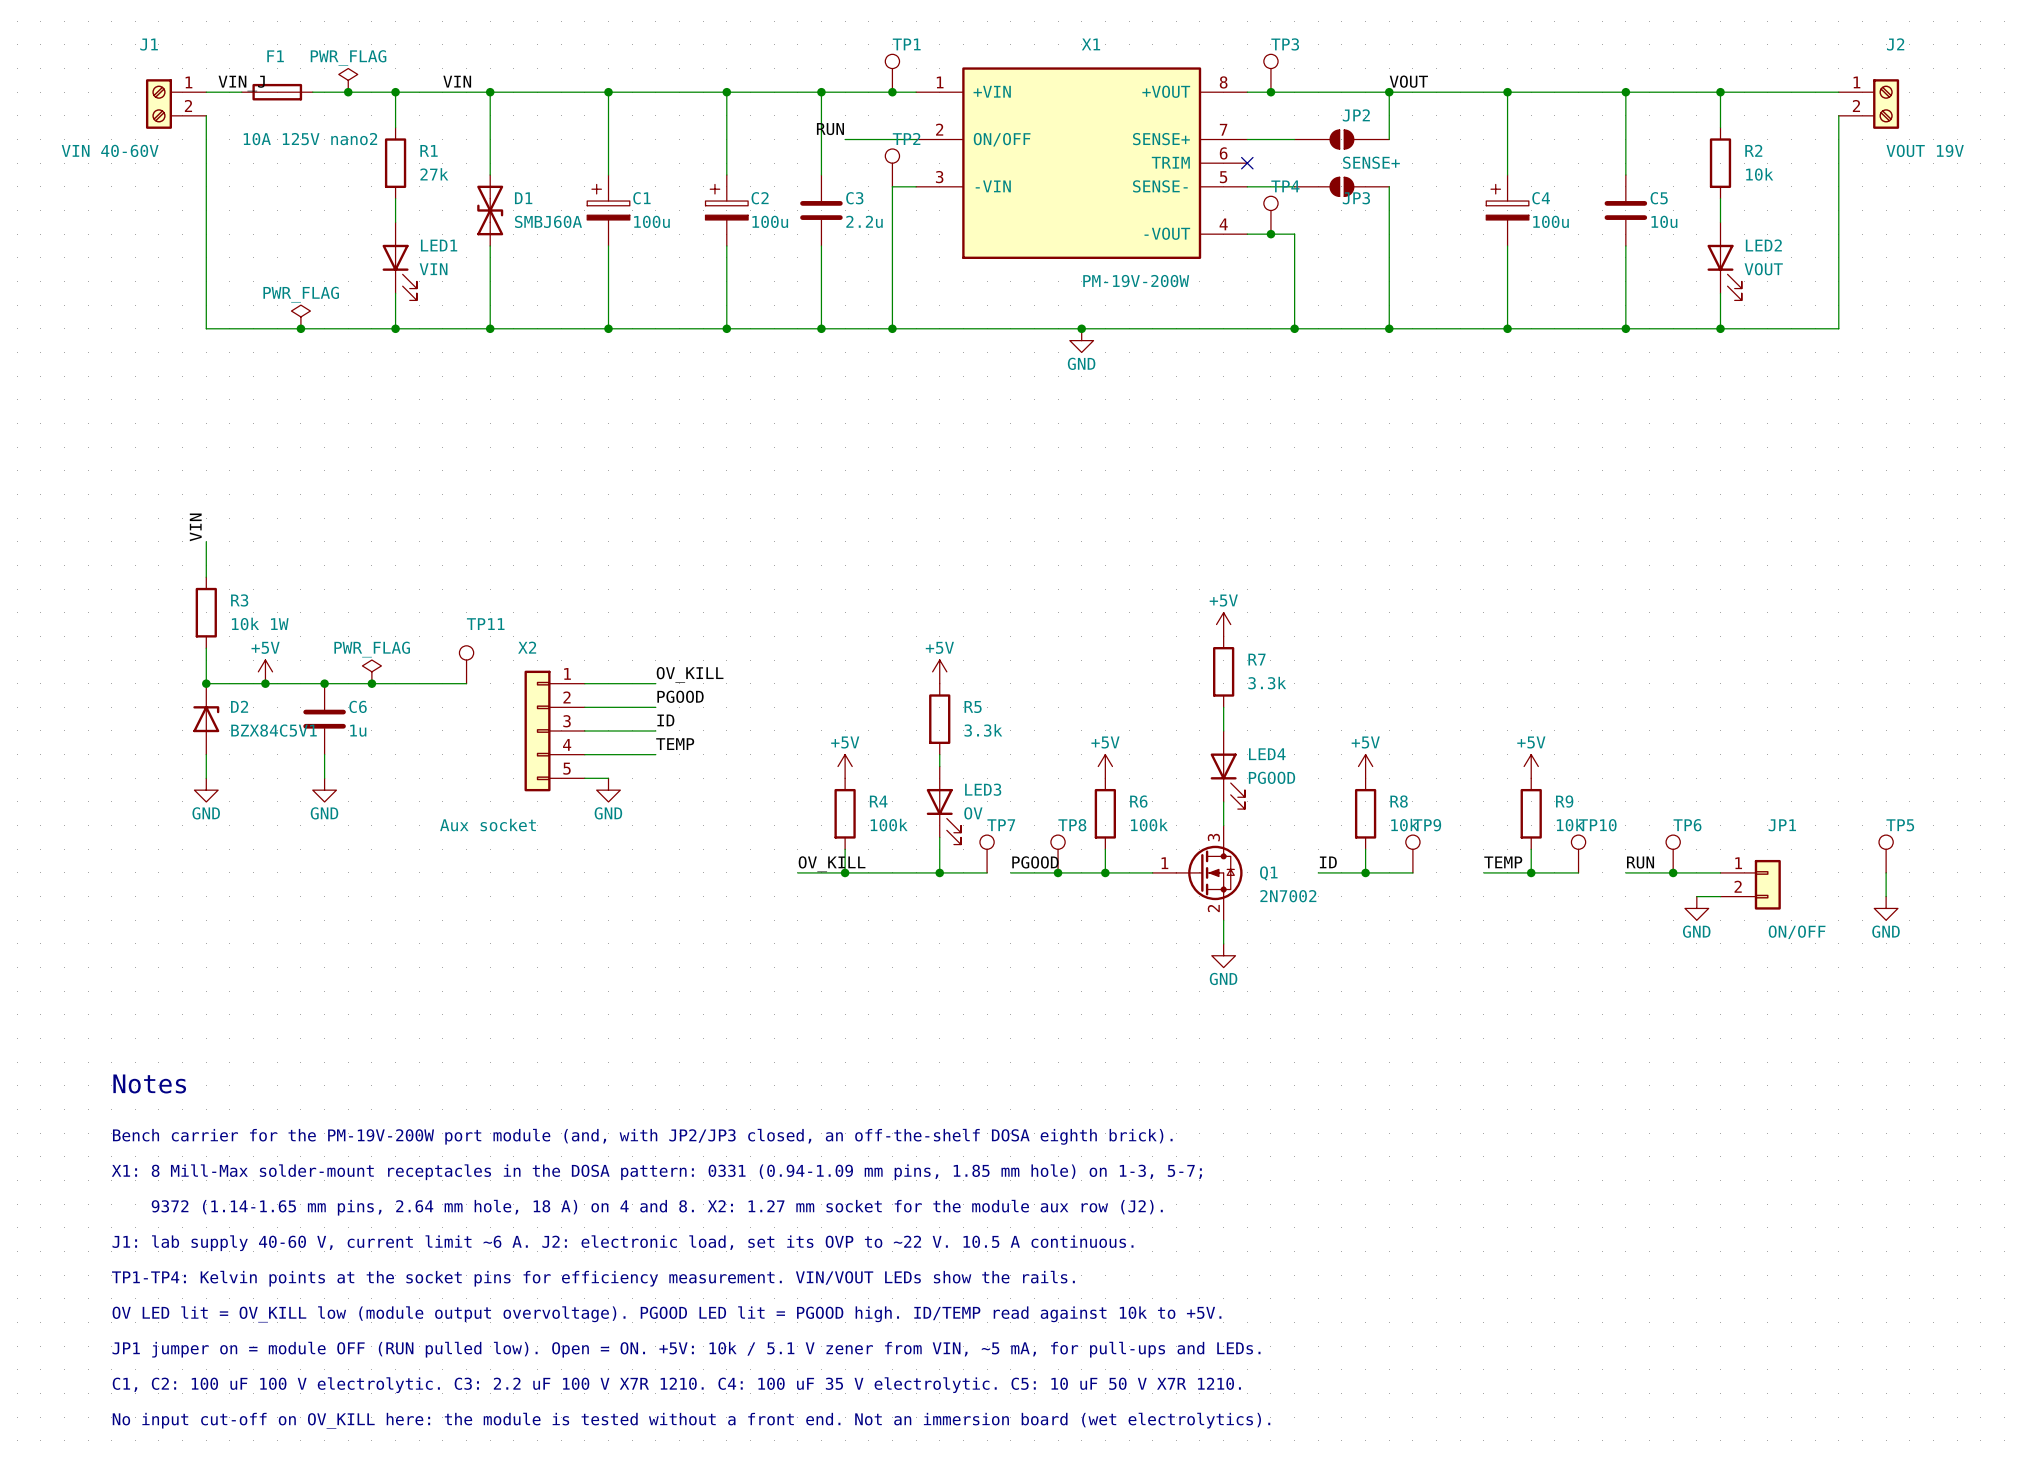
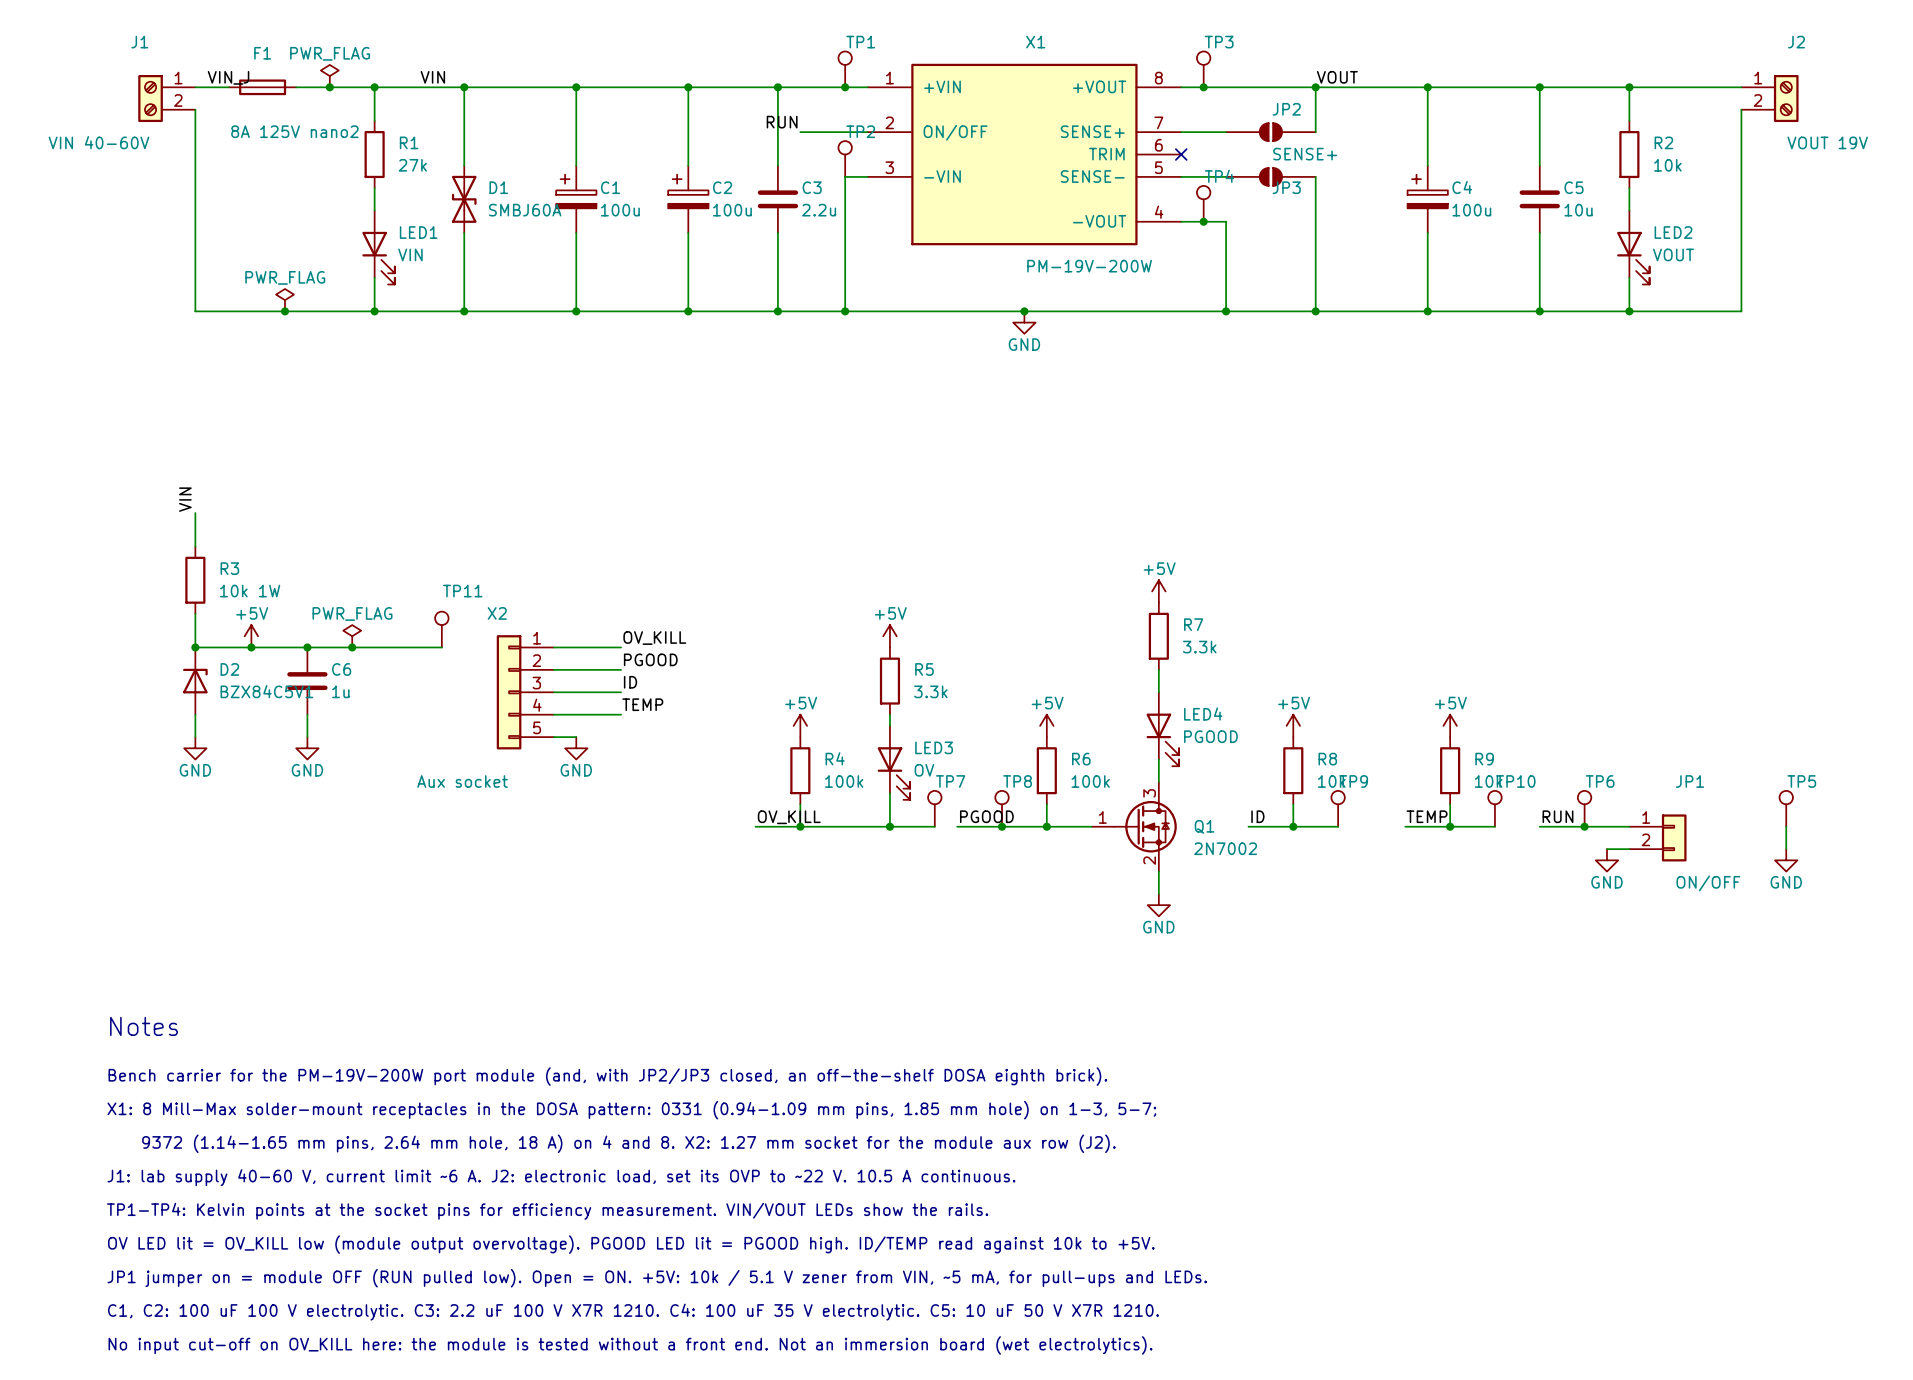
F1 value: 10A 125V nano2 (310, 139) -> 8A 125V nano2 (294, 131)

